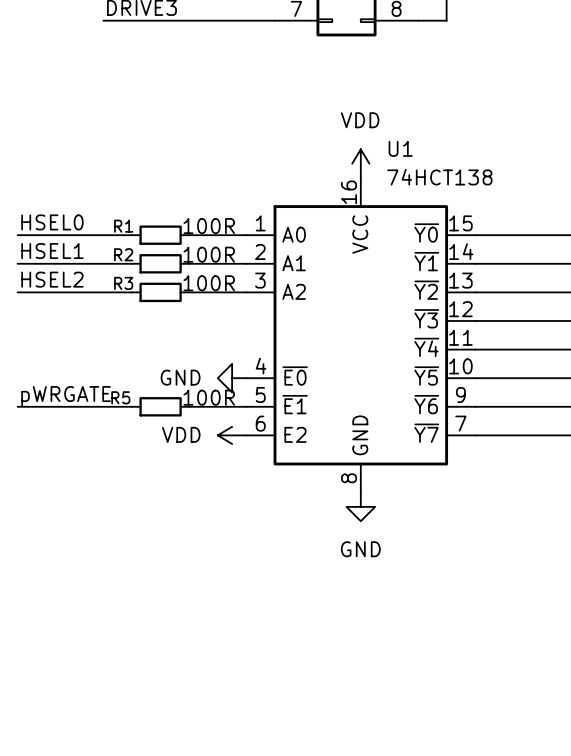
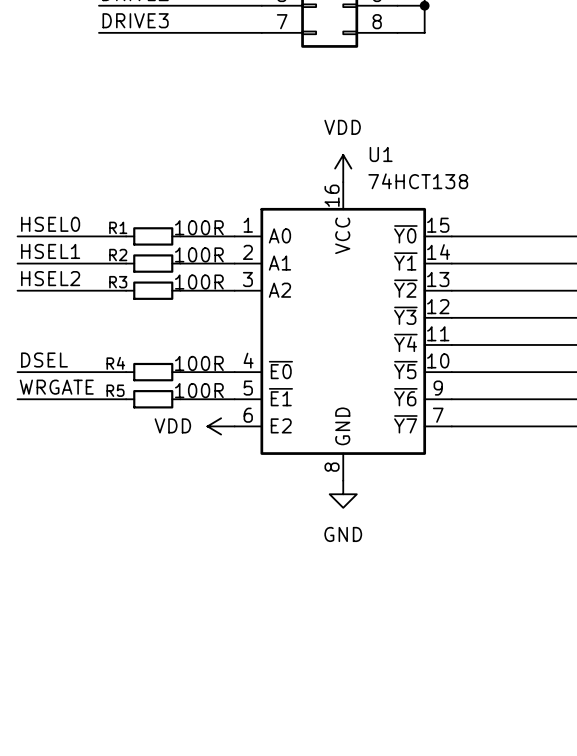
label: none -> DSEL (44, 360)
wire: none -> (17, 372) (126, 372)
R4: none -> 100R (153, 372)
wire: none -> (180, 372) (234, 372)
power symbol: GND (232, 378) -> none
label: pWRGATE (66, 396) -> WRGATE (56, 387)

